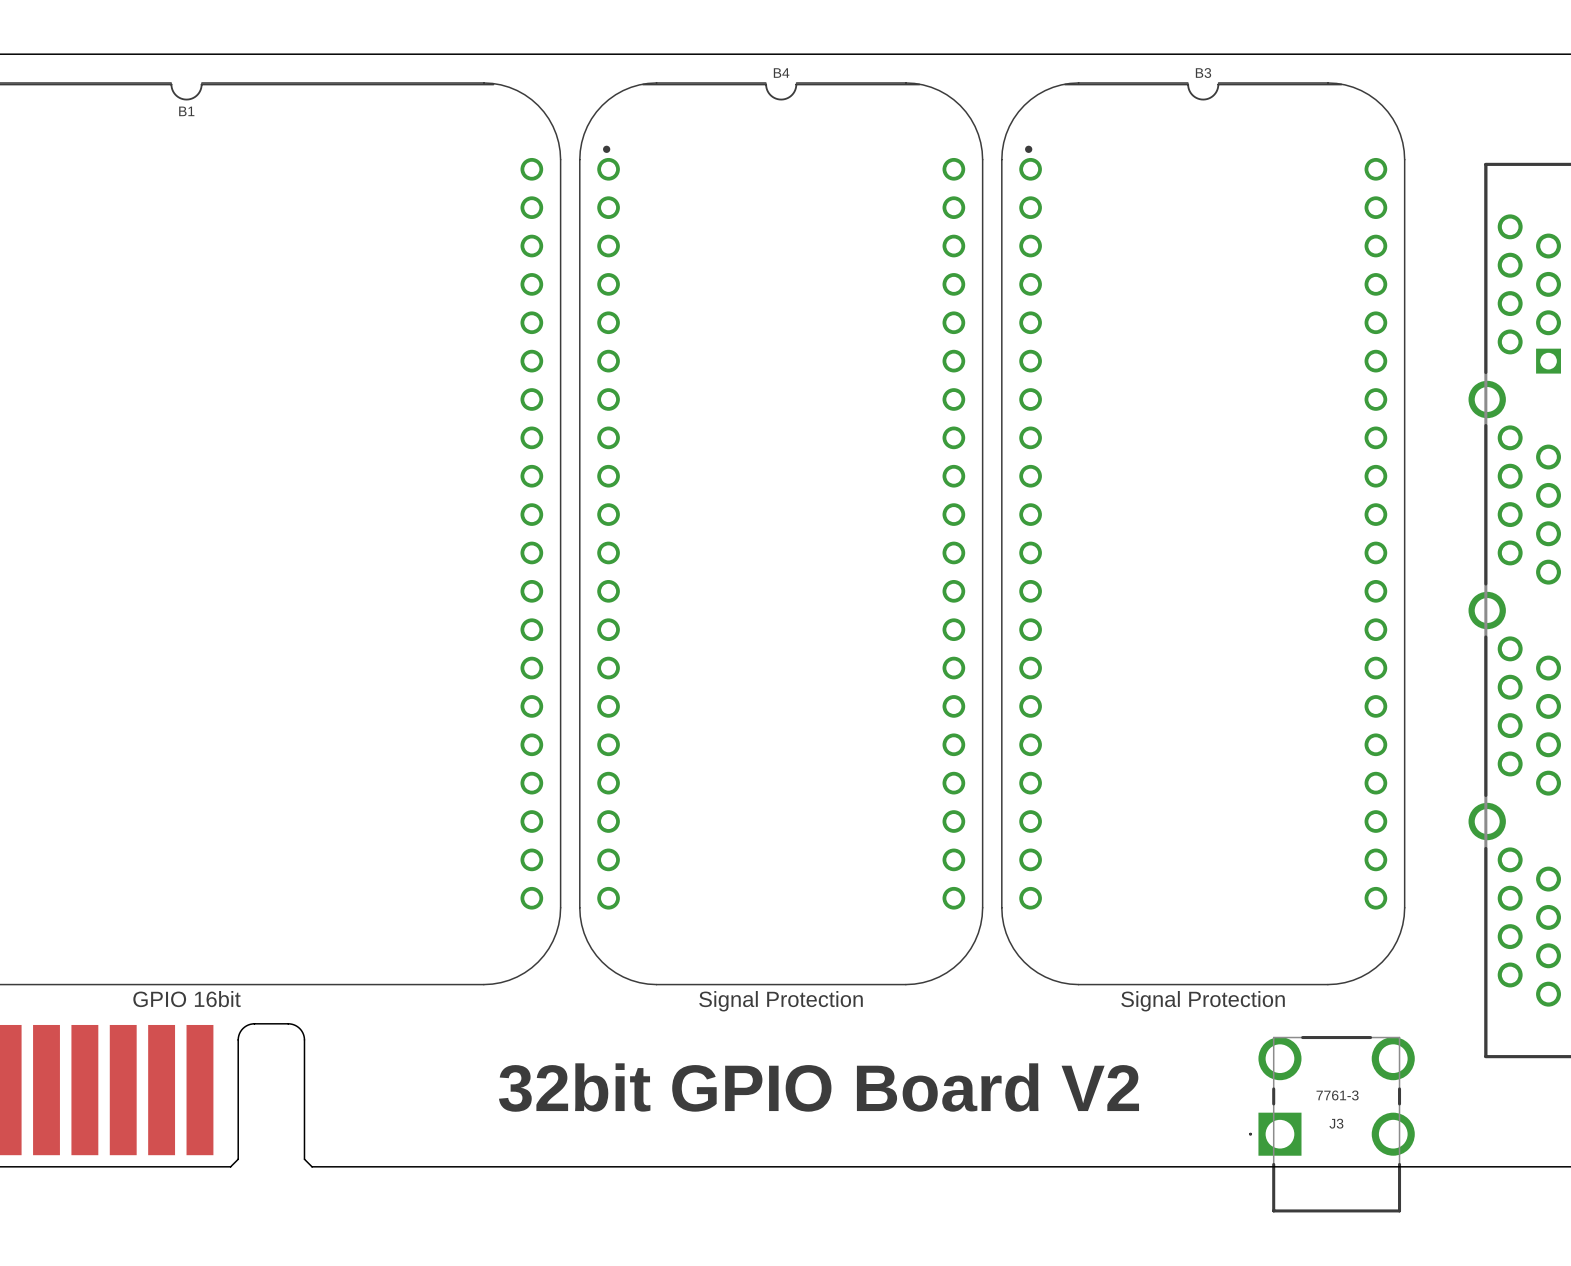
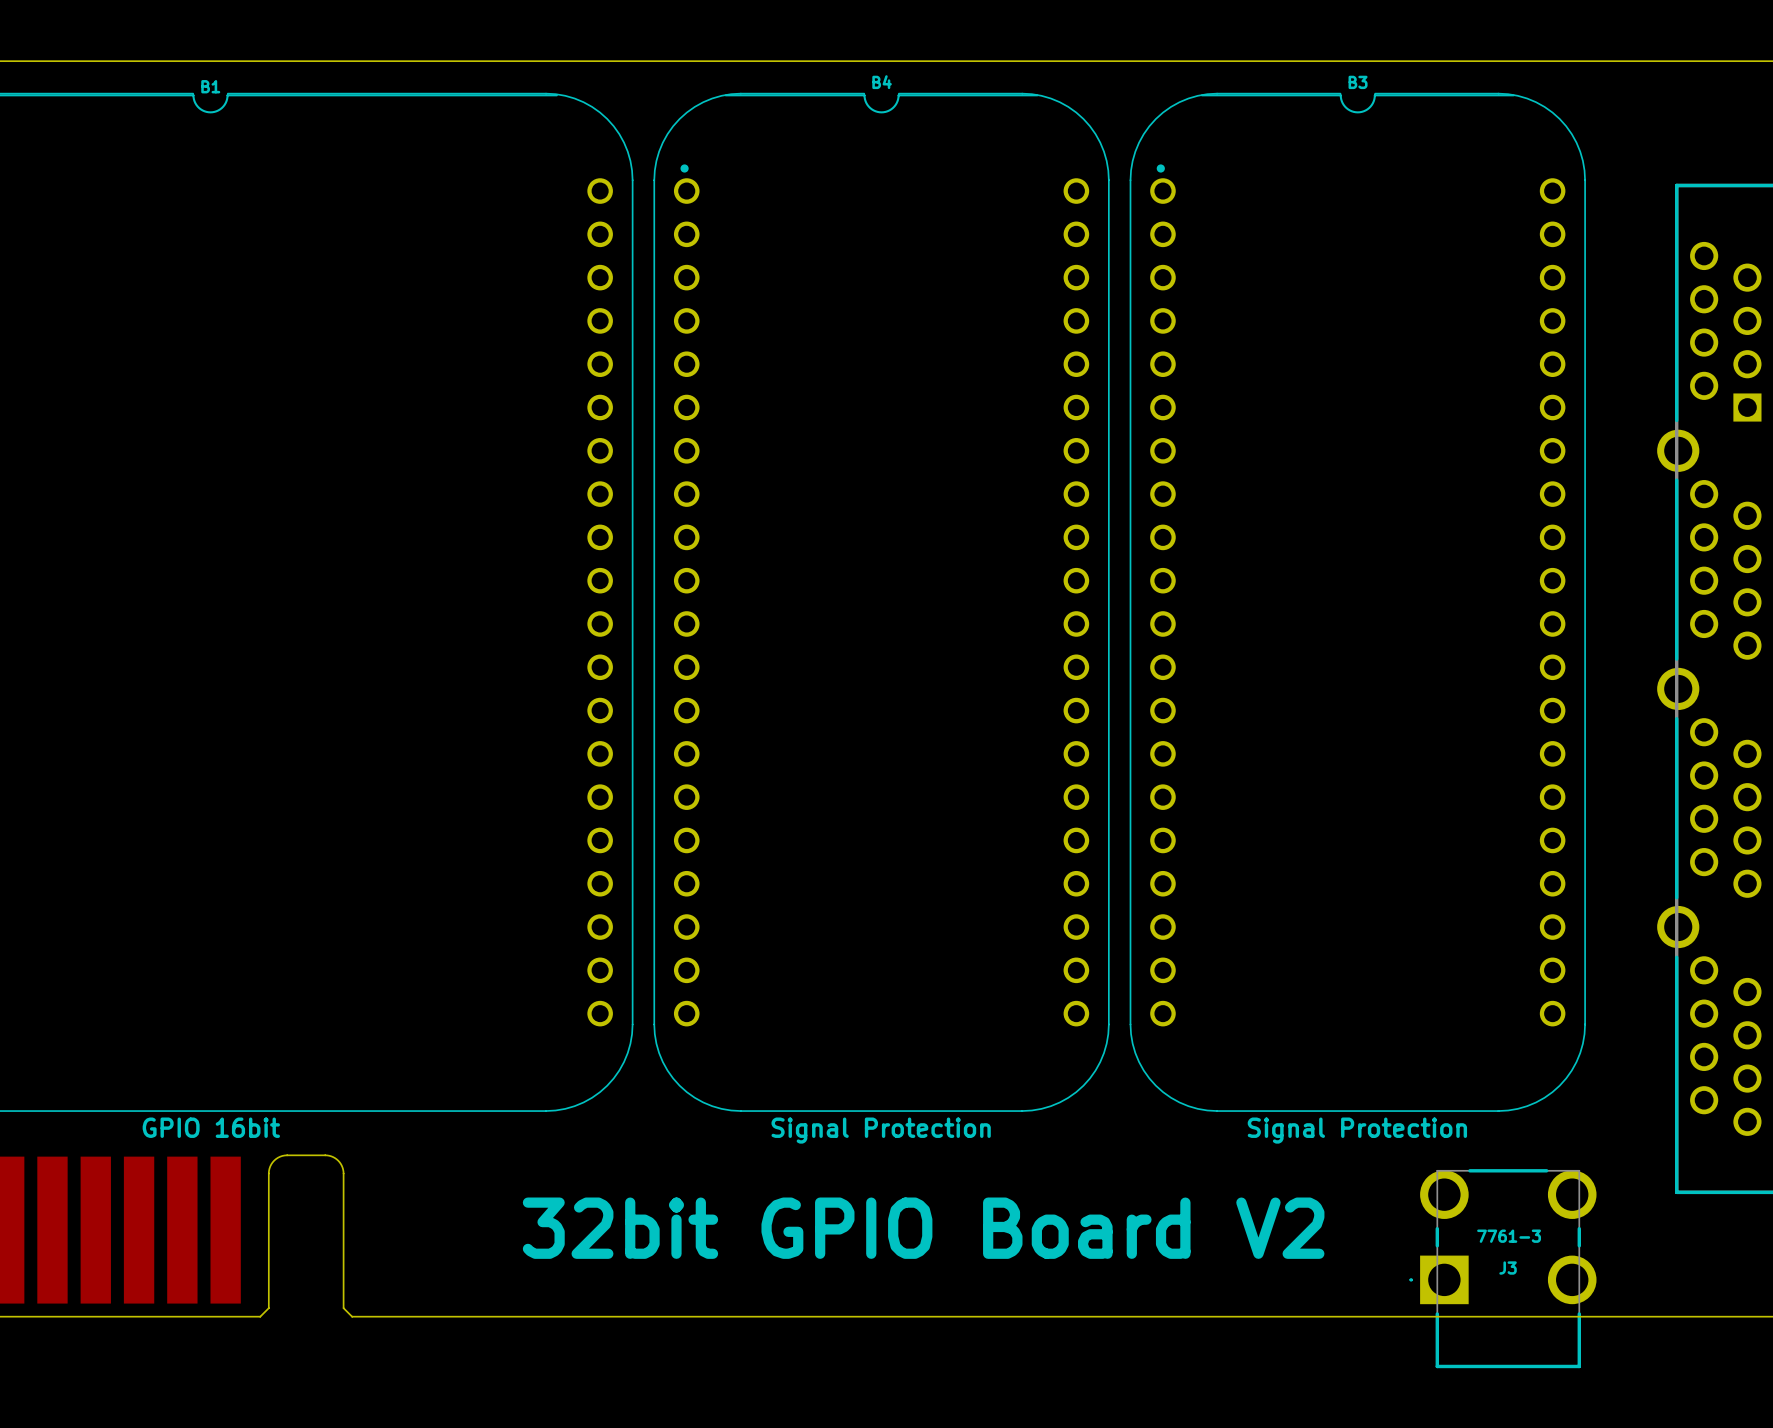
B1 name position: B1 (186, 111) -> B1 (210, 86)

